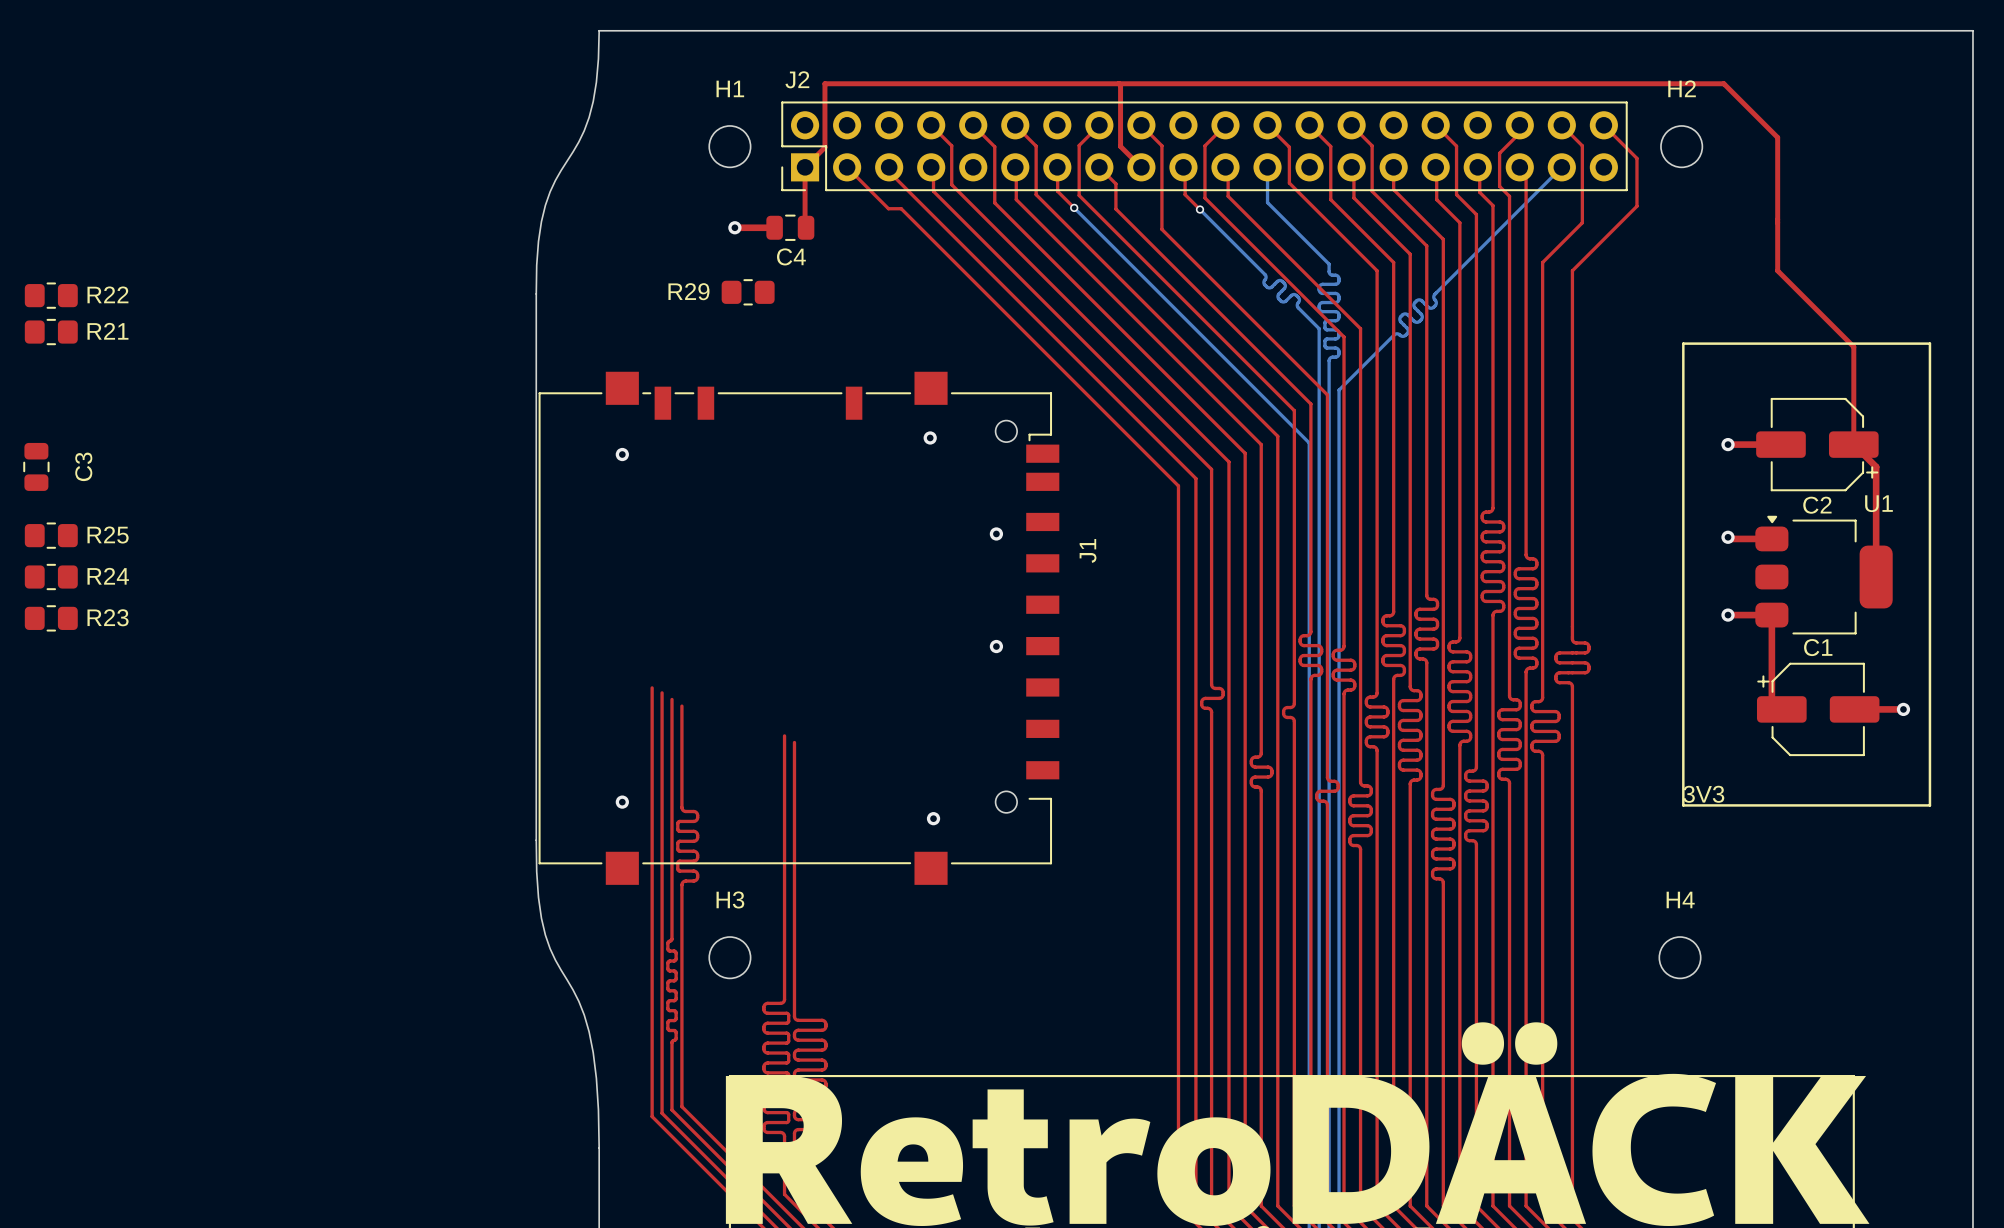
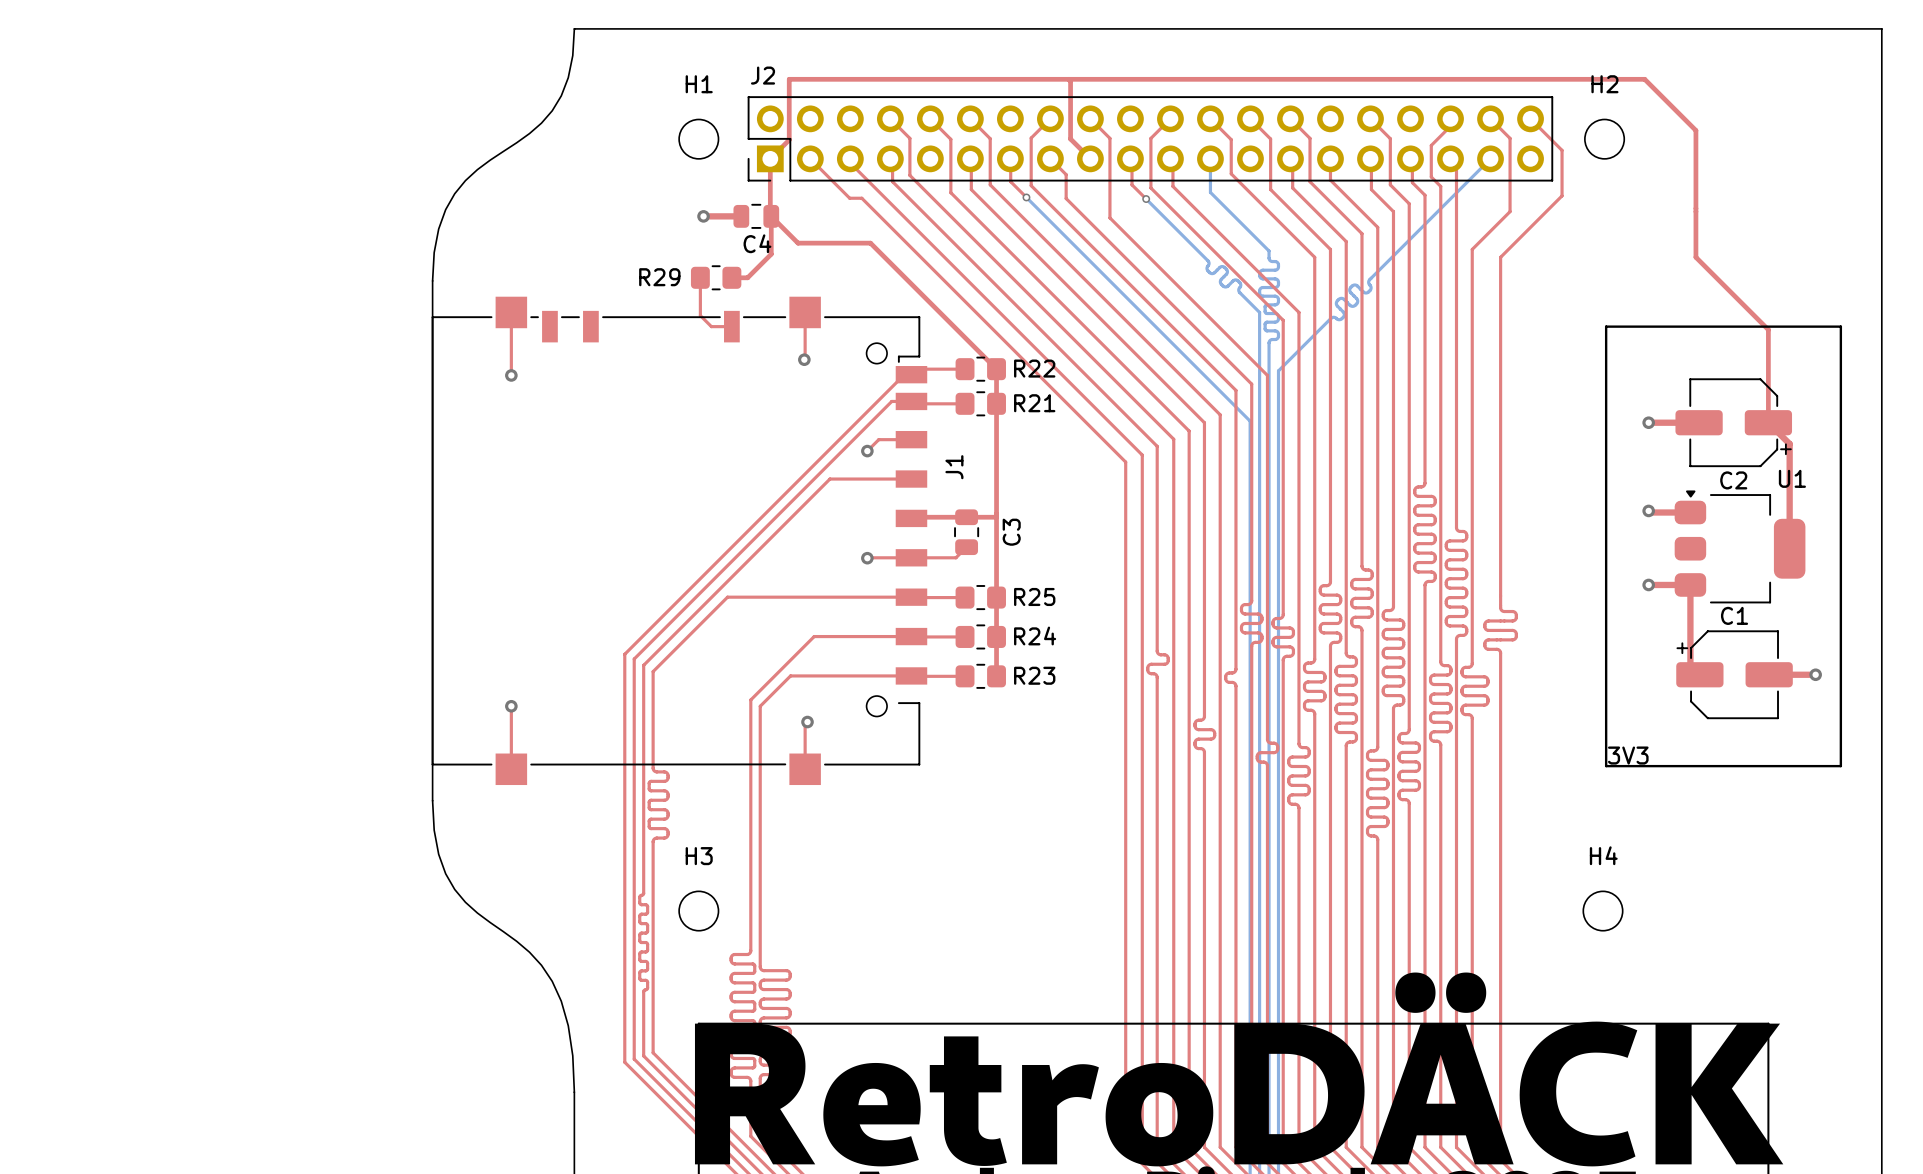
board edge: (599, 30) (596, 82) (589, 117) (578, 141) (550, 191) (541, 221) (536, 265) (536, 293) (536, 840) (538, 897) (541, 918) (550, 948) (578, 1001) (589, 1031) (596, 1078) (599, 1148) -> (574, 28) (572, 55) (568, 77) (561, 95) (552, 110) (529, 133) (490, 160) (465, 180) (445, 209) (438, 229) (434, 252) (432, 280) (432, 800) (434, 830) (438, 854) (445, 873) (454, 889) (477, 913) (529, 952) (552, 981) (561, 1001) (568, 1025) (572, 1055) (574, 1092)
top track: none -> (700, 277) (700, 315) (711, 326) (731, 326)
top track: none -> (731, 277) (747, 277) (771, 254) (771, 216) (798, 243) (870, 243) (996, 369) (996, 630)
R22 position: (51, 295) -> (980, 369)
top track: none -> (511, 312) (511, 375)
top track: none -> (805, 312) (804, 359)
R21 position: (51, 332) -> (980, 403)
via: none -> (804, 359)
top track: none -> (965, 369) (916, 369) (911, 374) (904, 374) (624, 654)
via: none -> (511, 375)
top track: none -> (965, 403) (913, 403) (911, 401) (891, 401) (634, 659)
via position: (930, 437) -> (867, 451)
via: (622, 454) -> none
top track: none -> (911, 439) (878, 439) (867, 451)
C3 position: (36, 466) -> (966, 532)
top track: none -> (911, 479) (829, 479) (643, 665)
via: (996, 533) -> none
R25 position: (51, 535) -> (980, 597)
top track: none -> (996, 517) (911, 518)
top track: none -> (966, 547) (955, 557) (867, 558)
R24 position: (51, 577) -> (980, 636)
via: none -> (867, 558)
R23 position: (51, 618) -> (980, 676)
J1 position: (798, 628) -> (679, 540)
top track: none -> (965, 597) (727, 597) (653, 671)
via: (996, 646) -> none
top track: none -> (965, 636) (814, 636) (750, 699)
top track: none -> (996, 636) (996, 676)
top track: none -> (965, 676) (790, 675) (760, 706)
top track: none -> (511, 706) (511, 769)
via: none -> (511, 706)
top track: none -> (807, 722) (805, 724) (805, 769)
via: none -> (807, 722)
via: (622, 802) -> none
via: (933, 818) -> none

